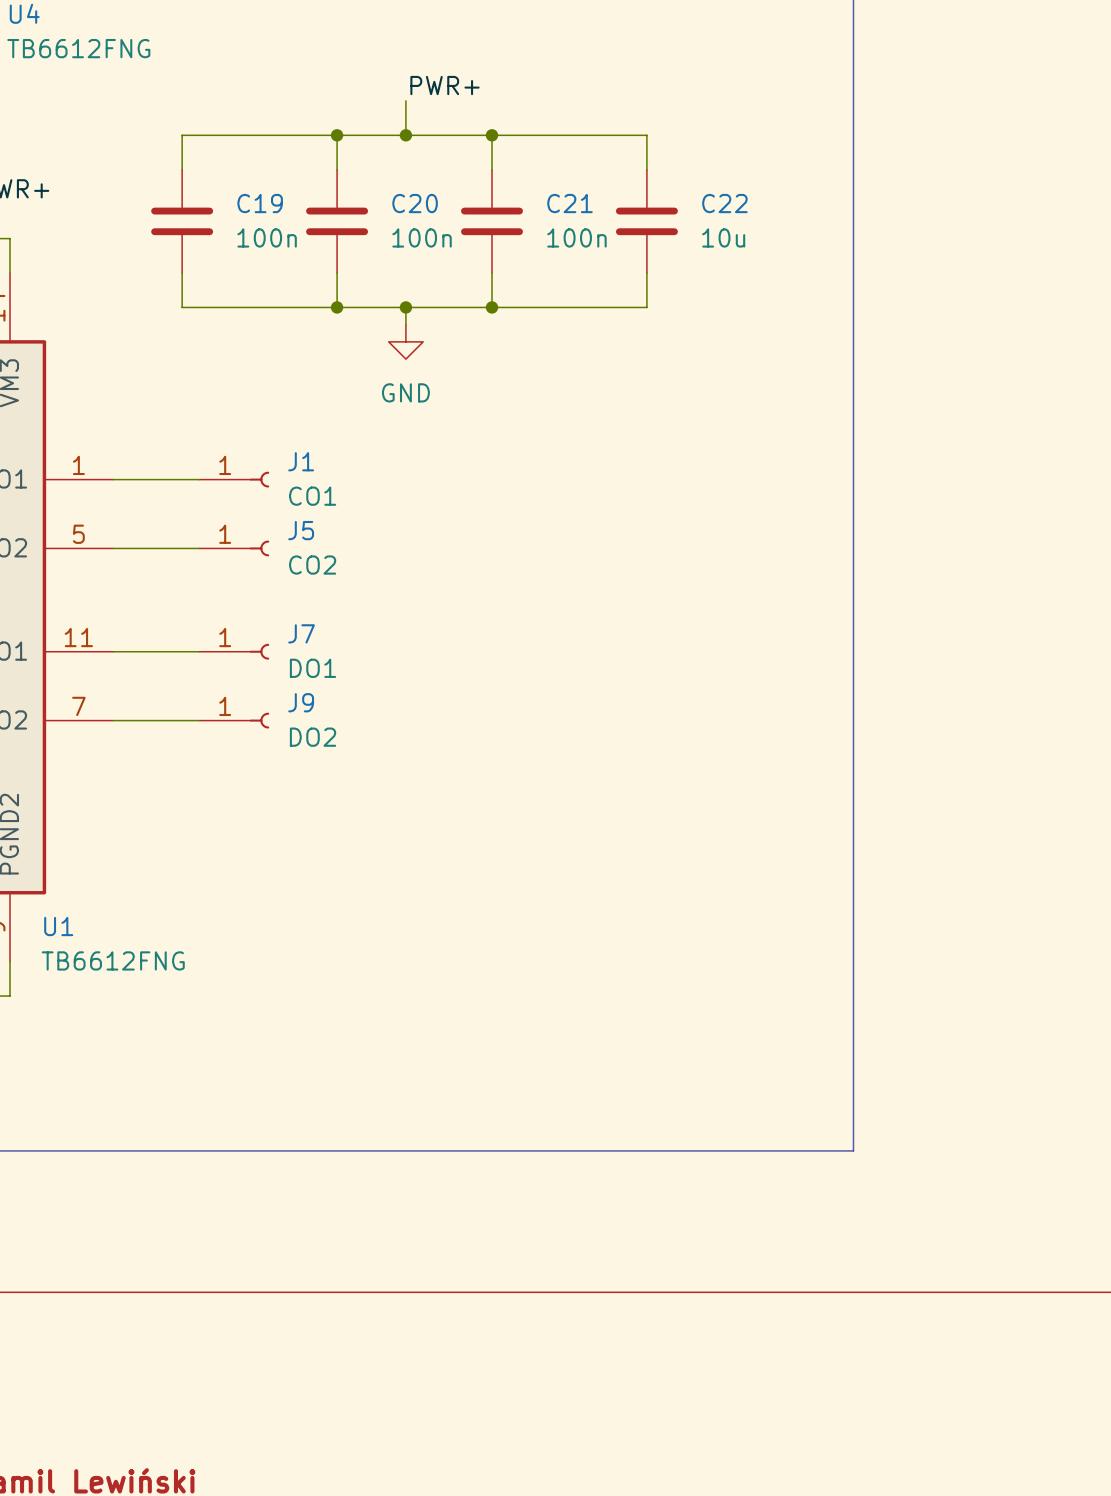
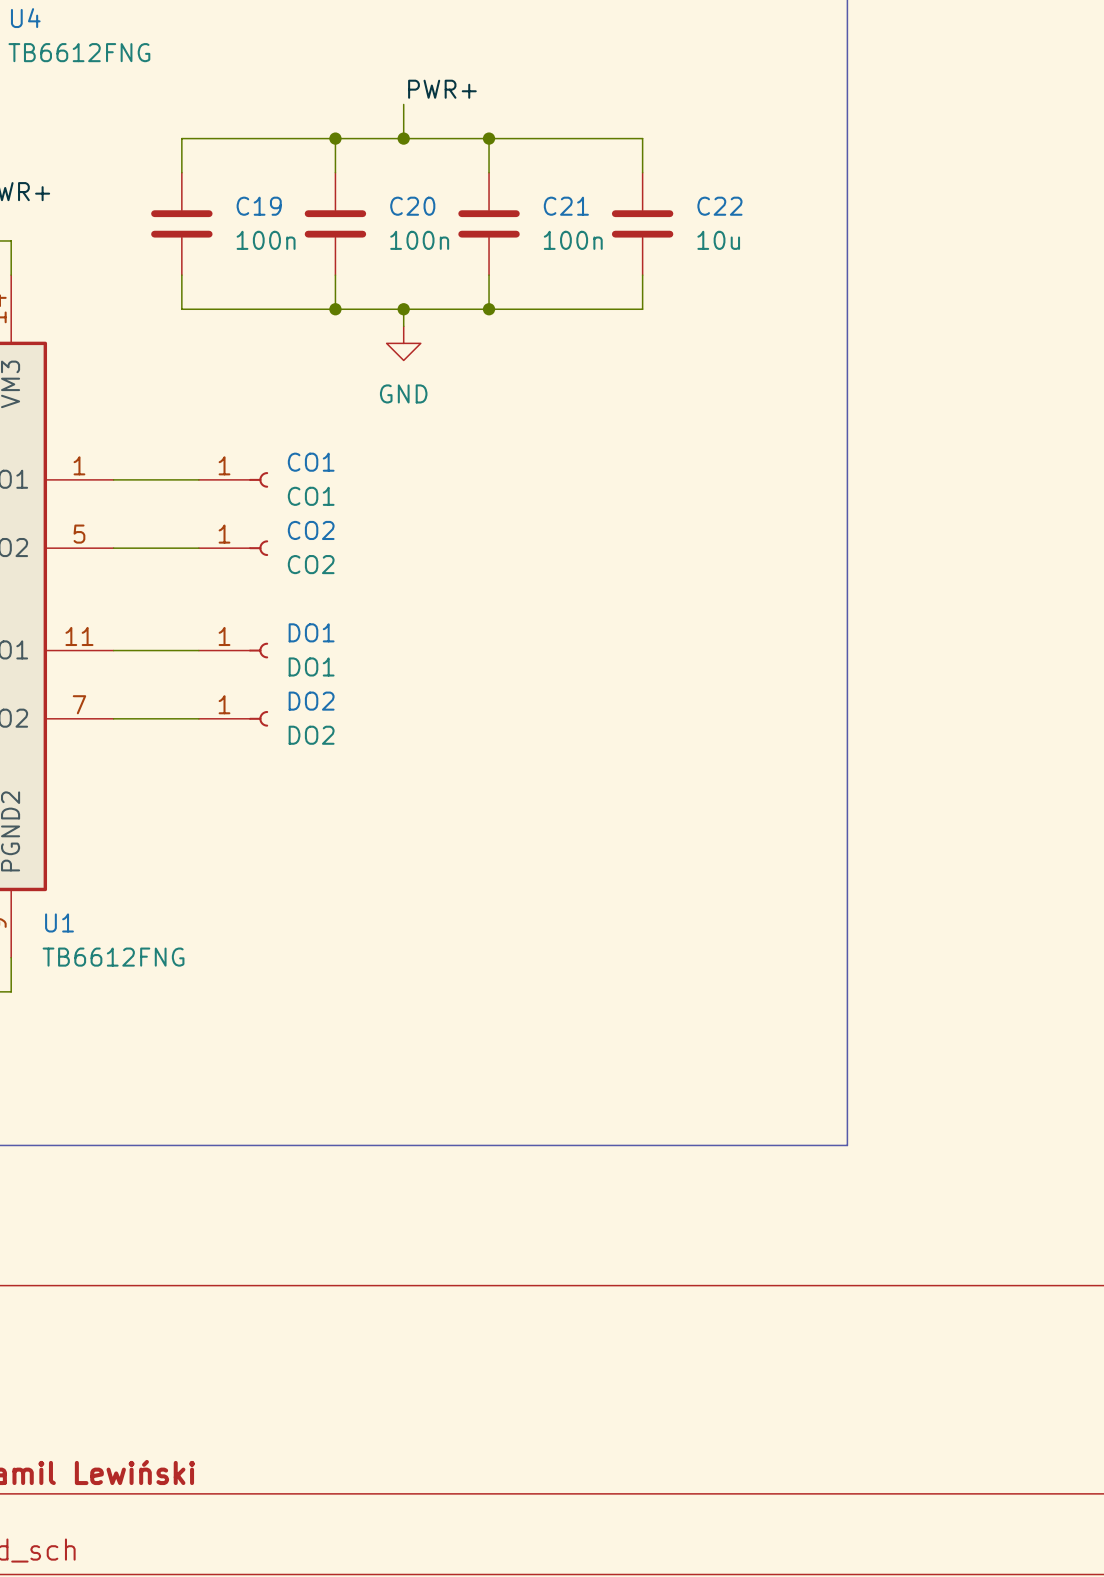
J1 name: J1 (301, 461) -> CO1 (311, 462)
J5 name: J5 (301, 530) -> CO2 (311, 530)
J7 name: J7 (301, 633) -> DO1 (311, 632)
J9 name: J9 (301, 702) -> DO2 (311, 701)

